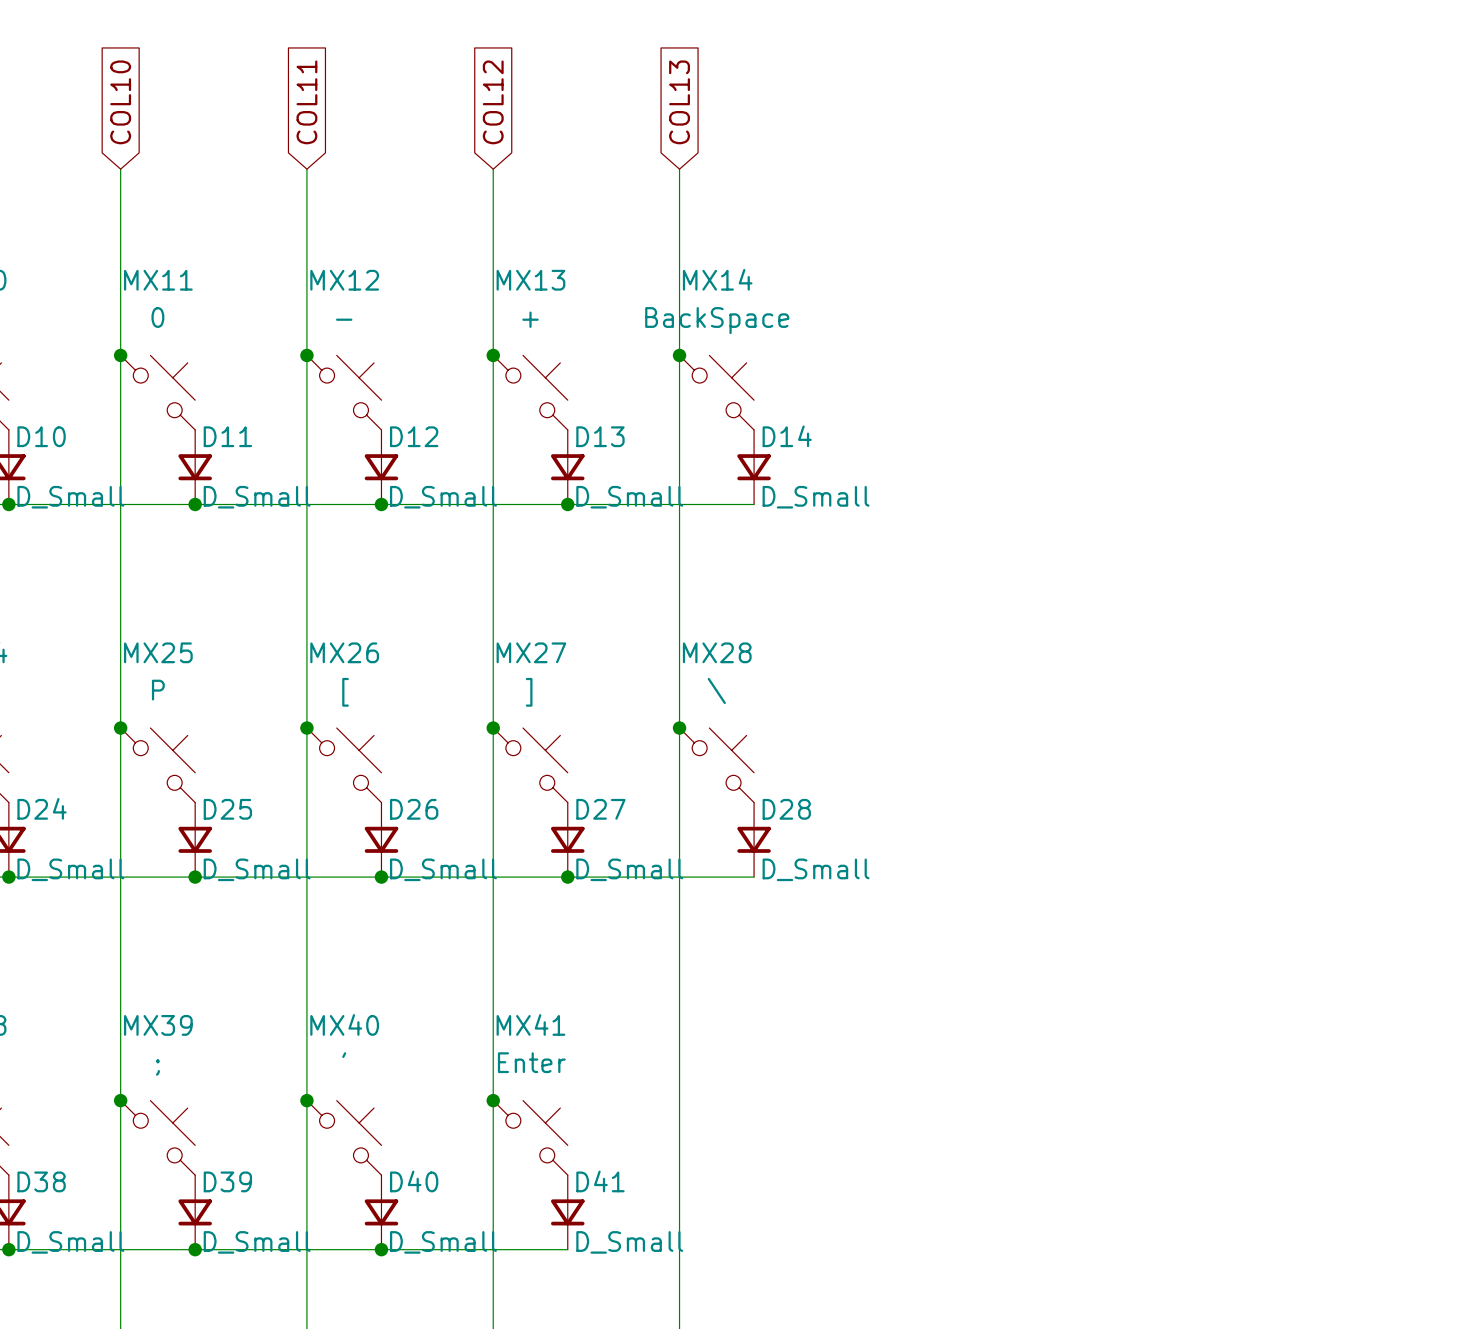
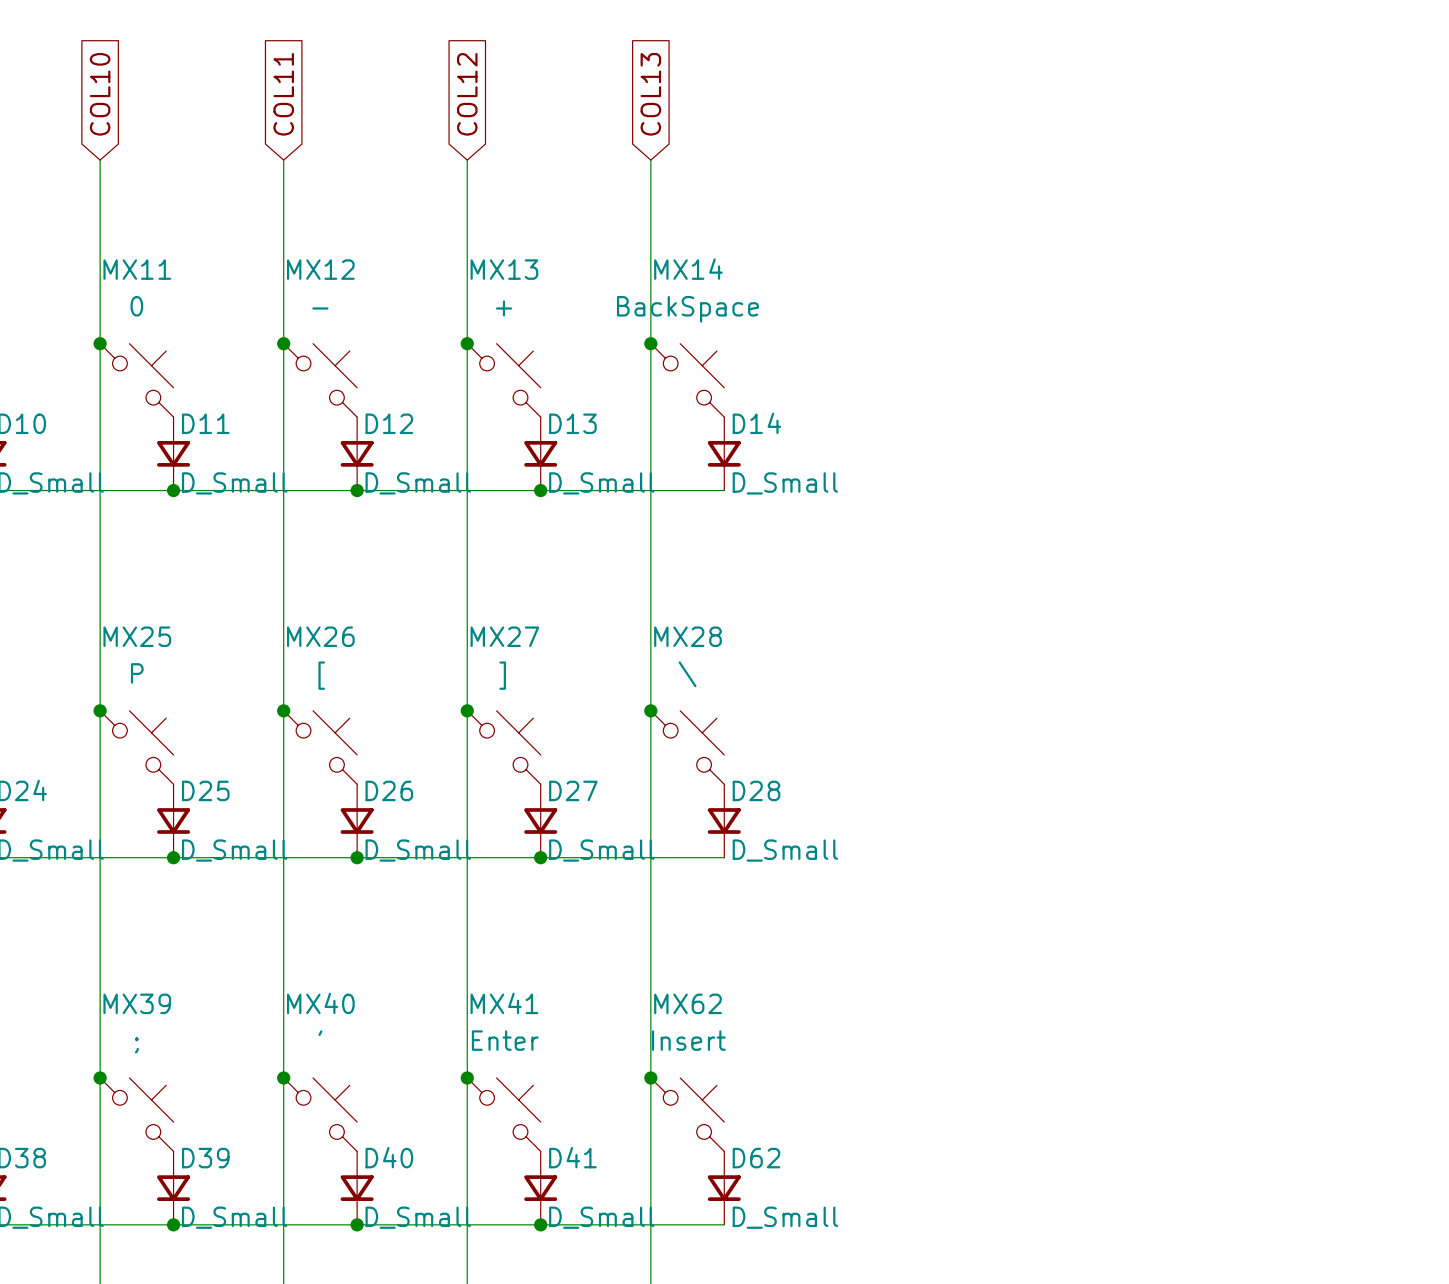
junction: none -> (650, 1077)
MX62: none -> Insert (687, 1114)
D62: none -> D_Small (724, 1188)
wire: none -> (540, 1224) (724, 1224)
junction: none -> (540, 1224)

